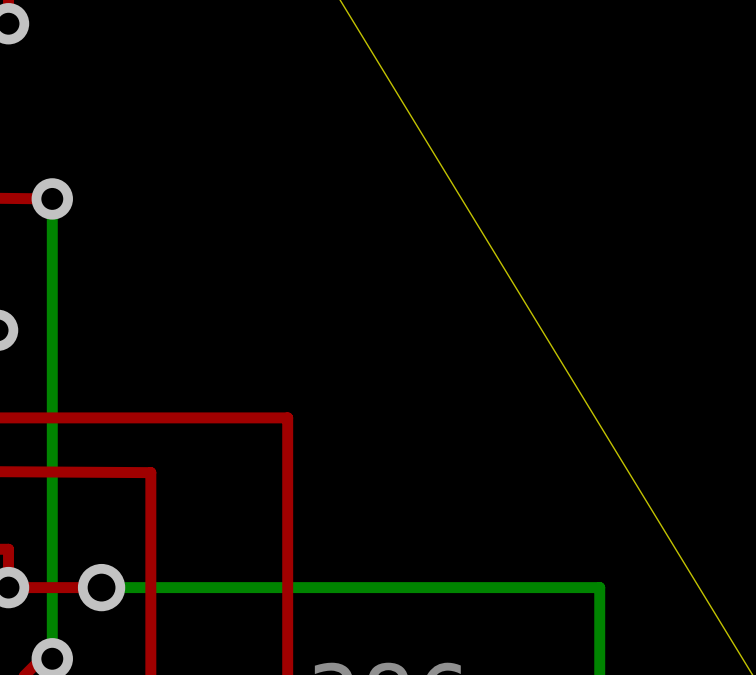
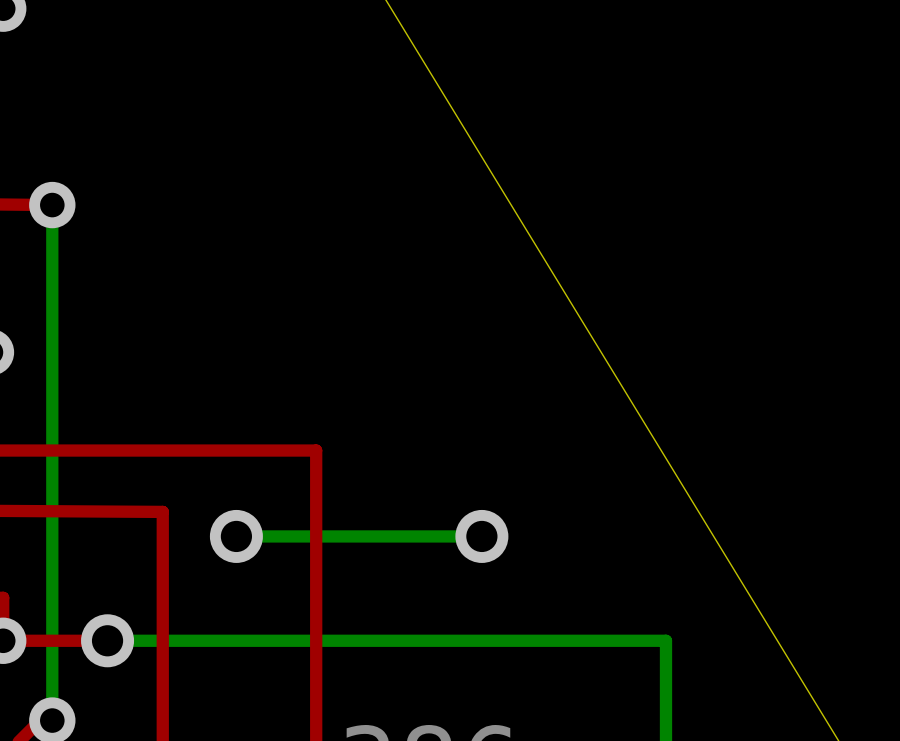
bottom track: none -> (236, 536) (481, 536)
via: none -> (236, 536)
via: none -> (481, 536)

